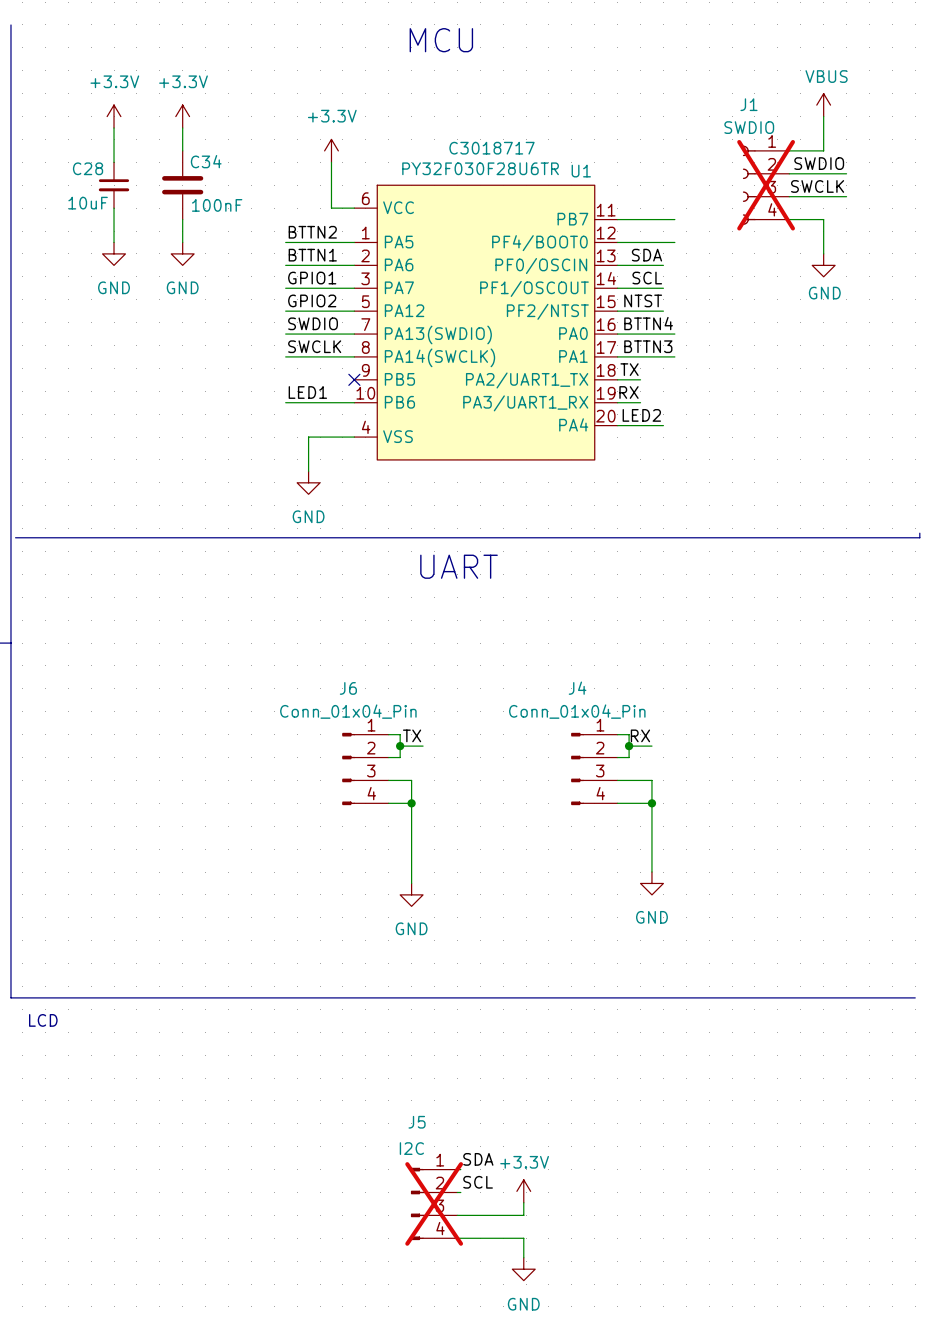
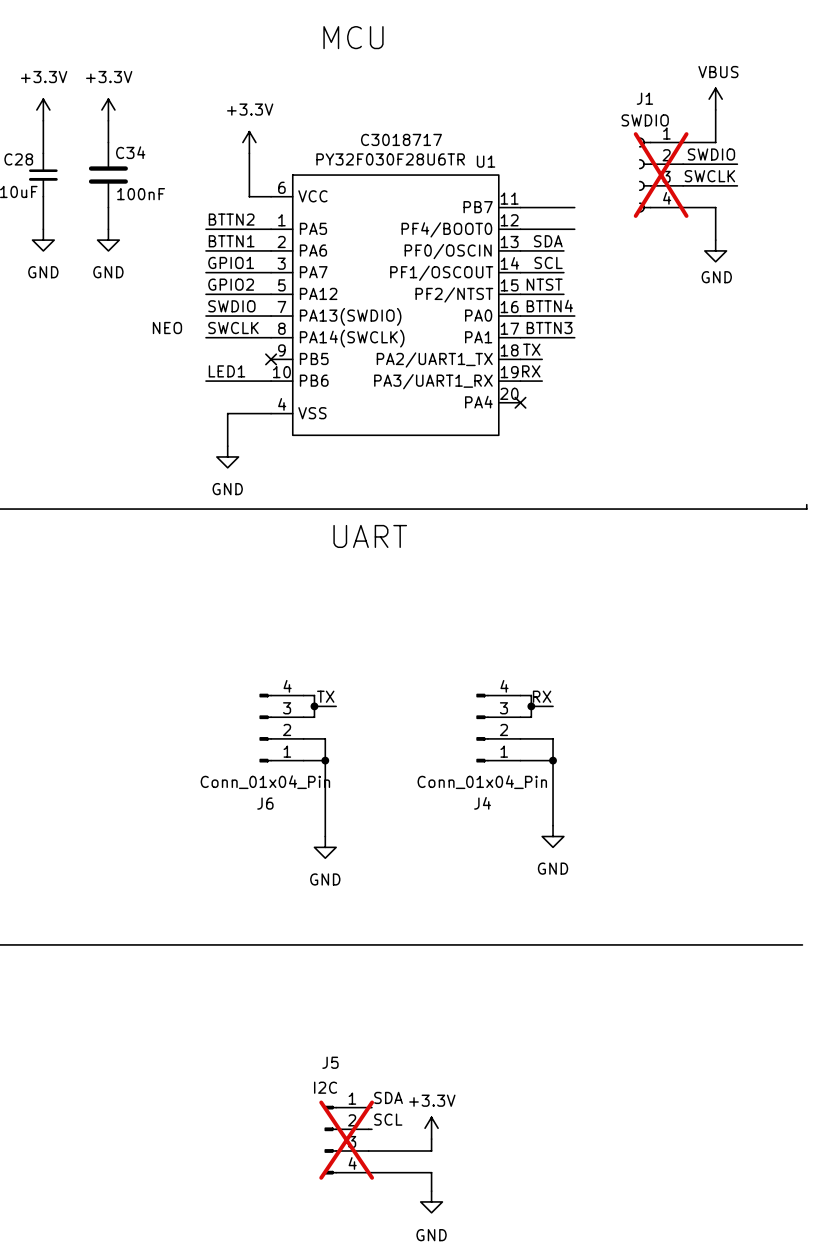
label: none -> NEO (167, 328)
label: LED2 (641, 415) -> none
wire: (617, 425) (663, 425) -> none
no-connect mark: none -> (520, 402)
J6 flip: as is (348, 768) -> up-down (265, 728)
J4 flip: as is (577, 768) -> up-down (482, 728)

